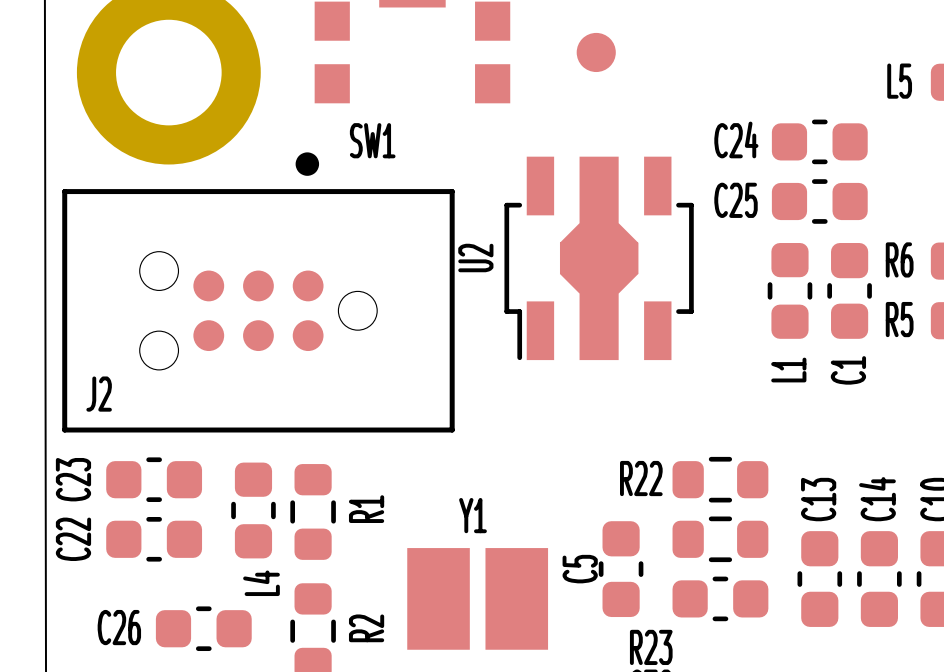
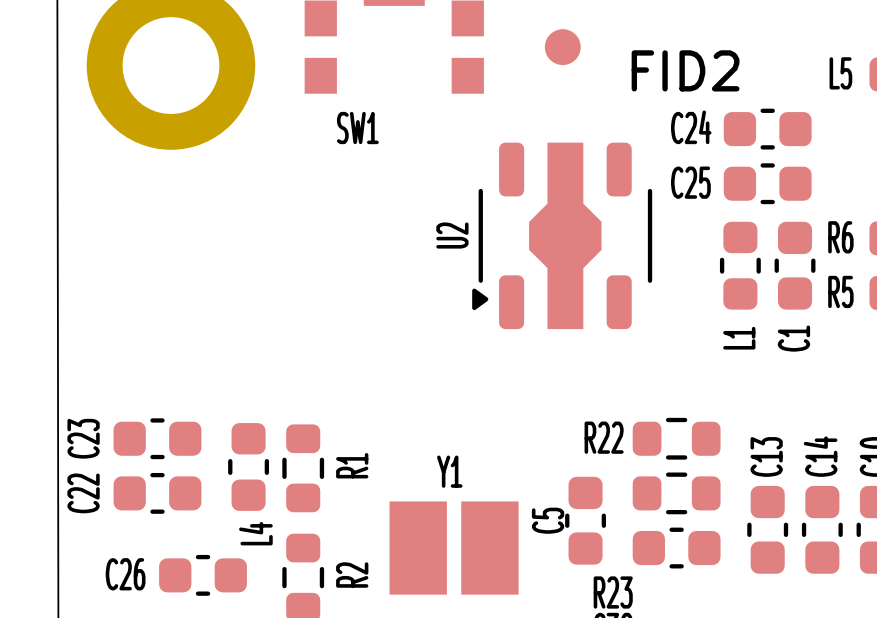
FID2 name: none -> FID2 (685, 70)
U2 footprint: [504, 156, 694, 361] -> [472, 142, 653, 330]
J2: (258, 292) -> none

